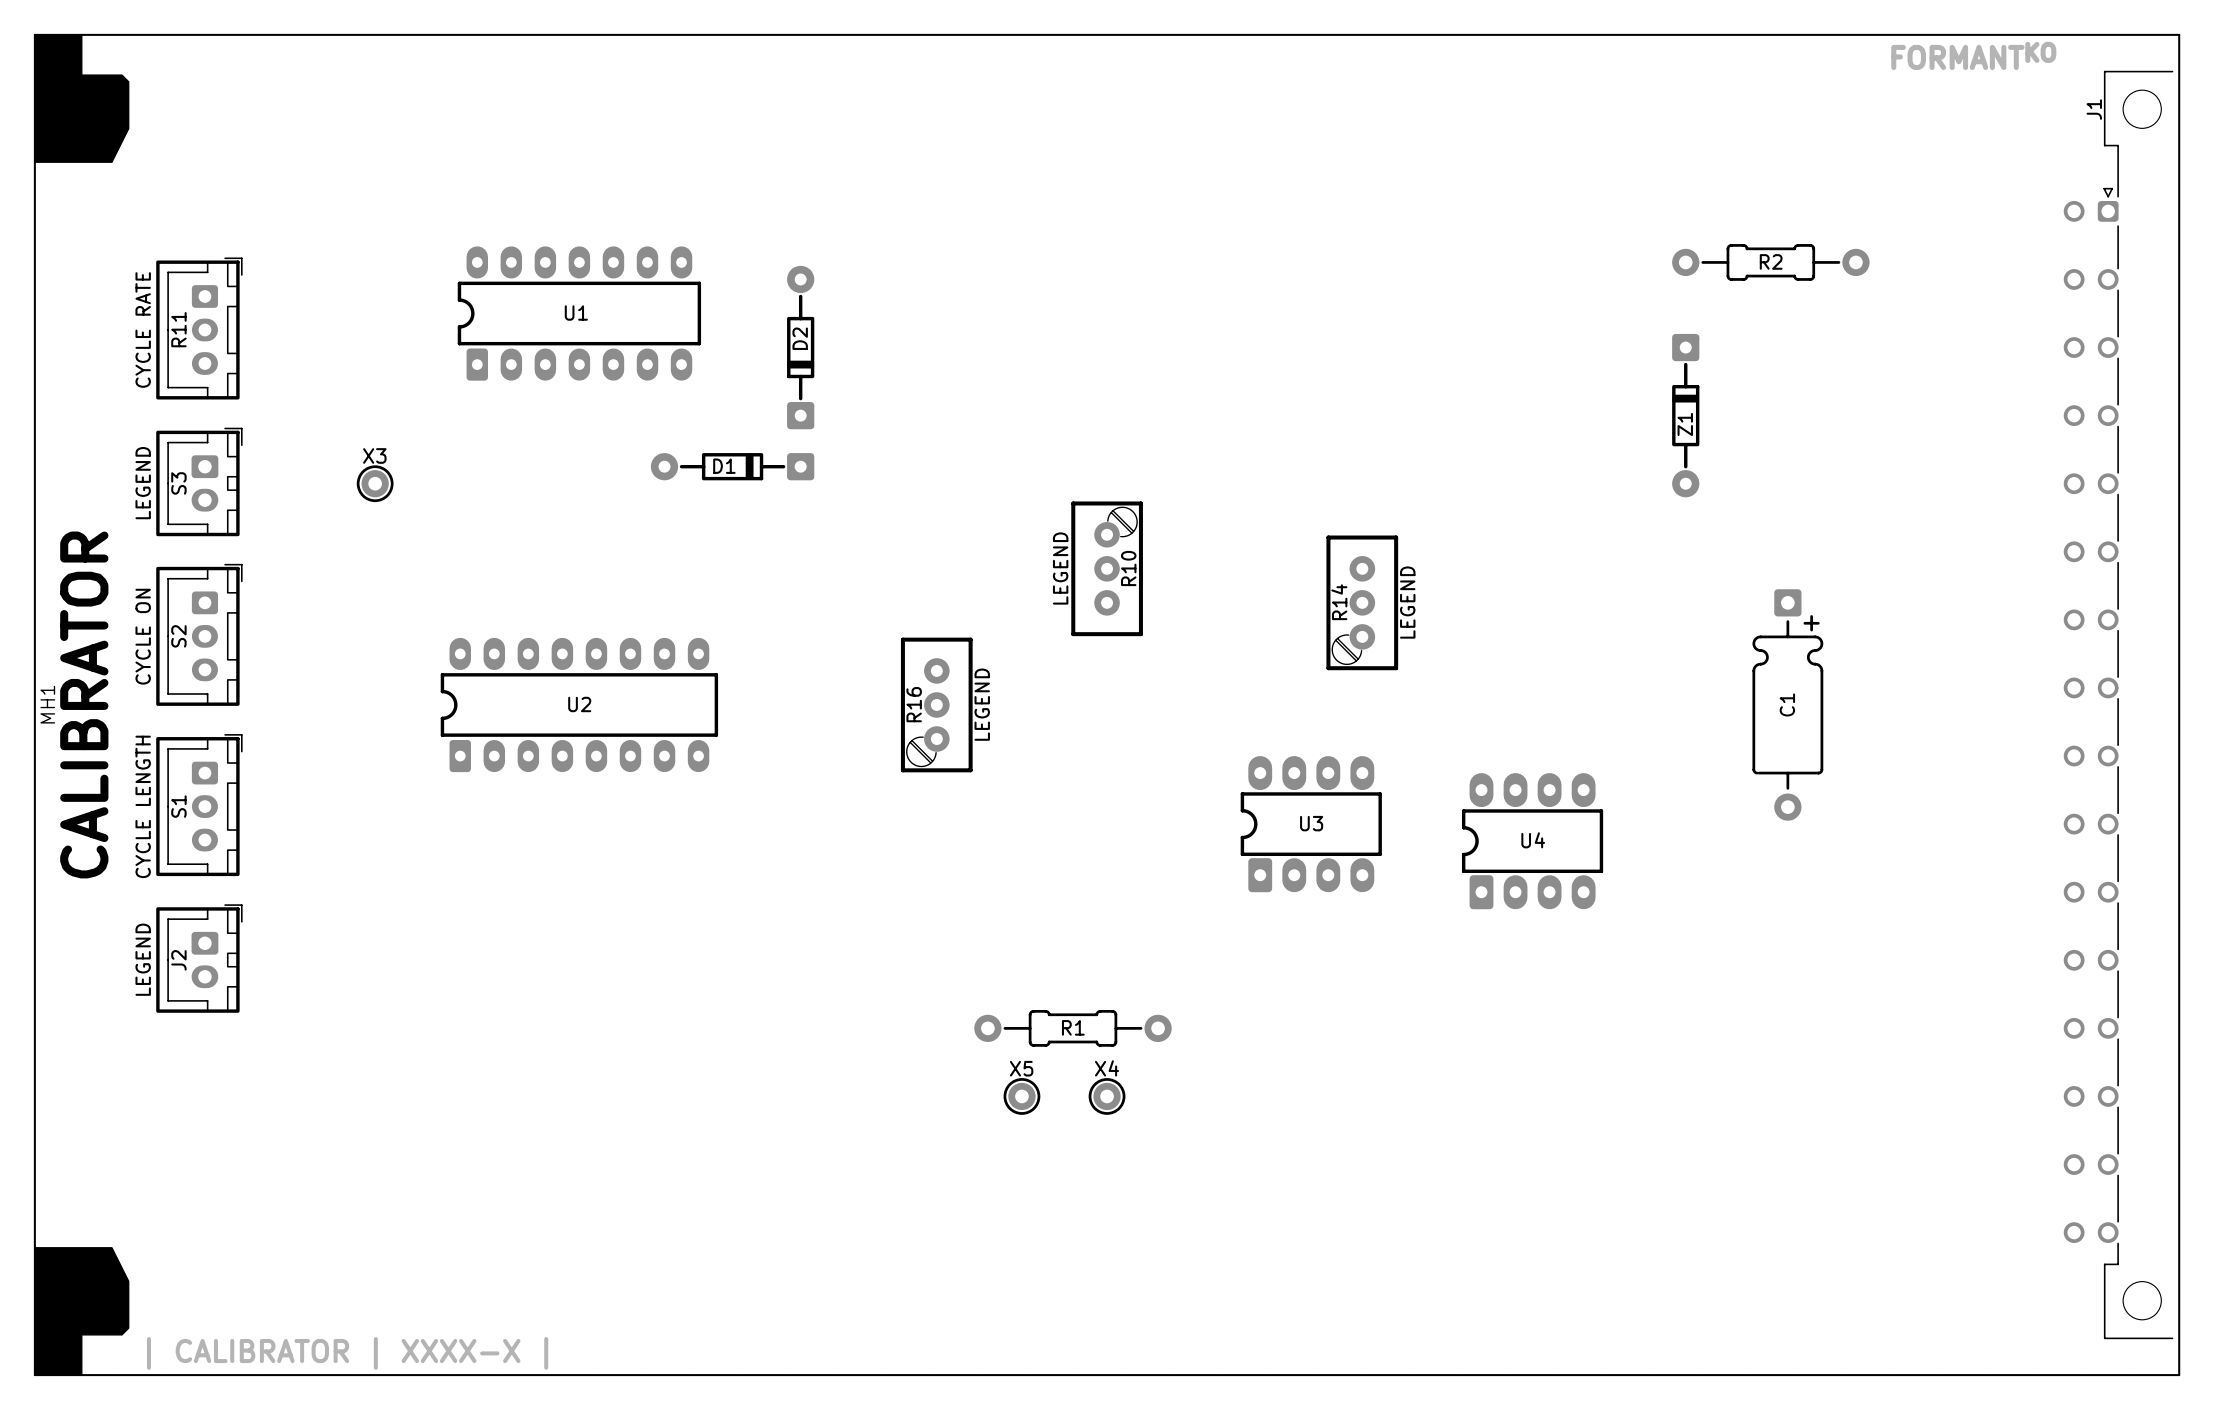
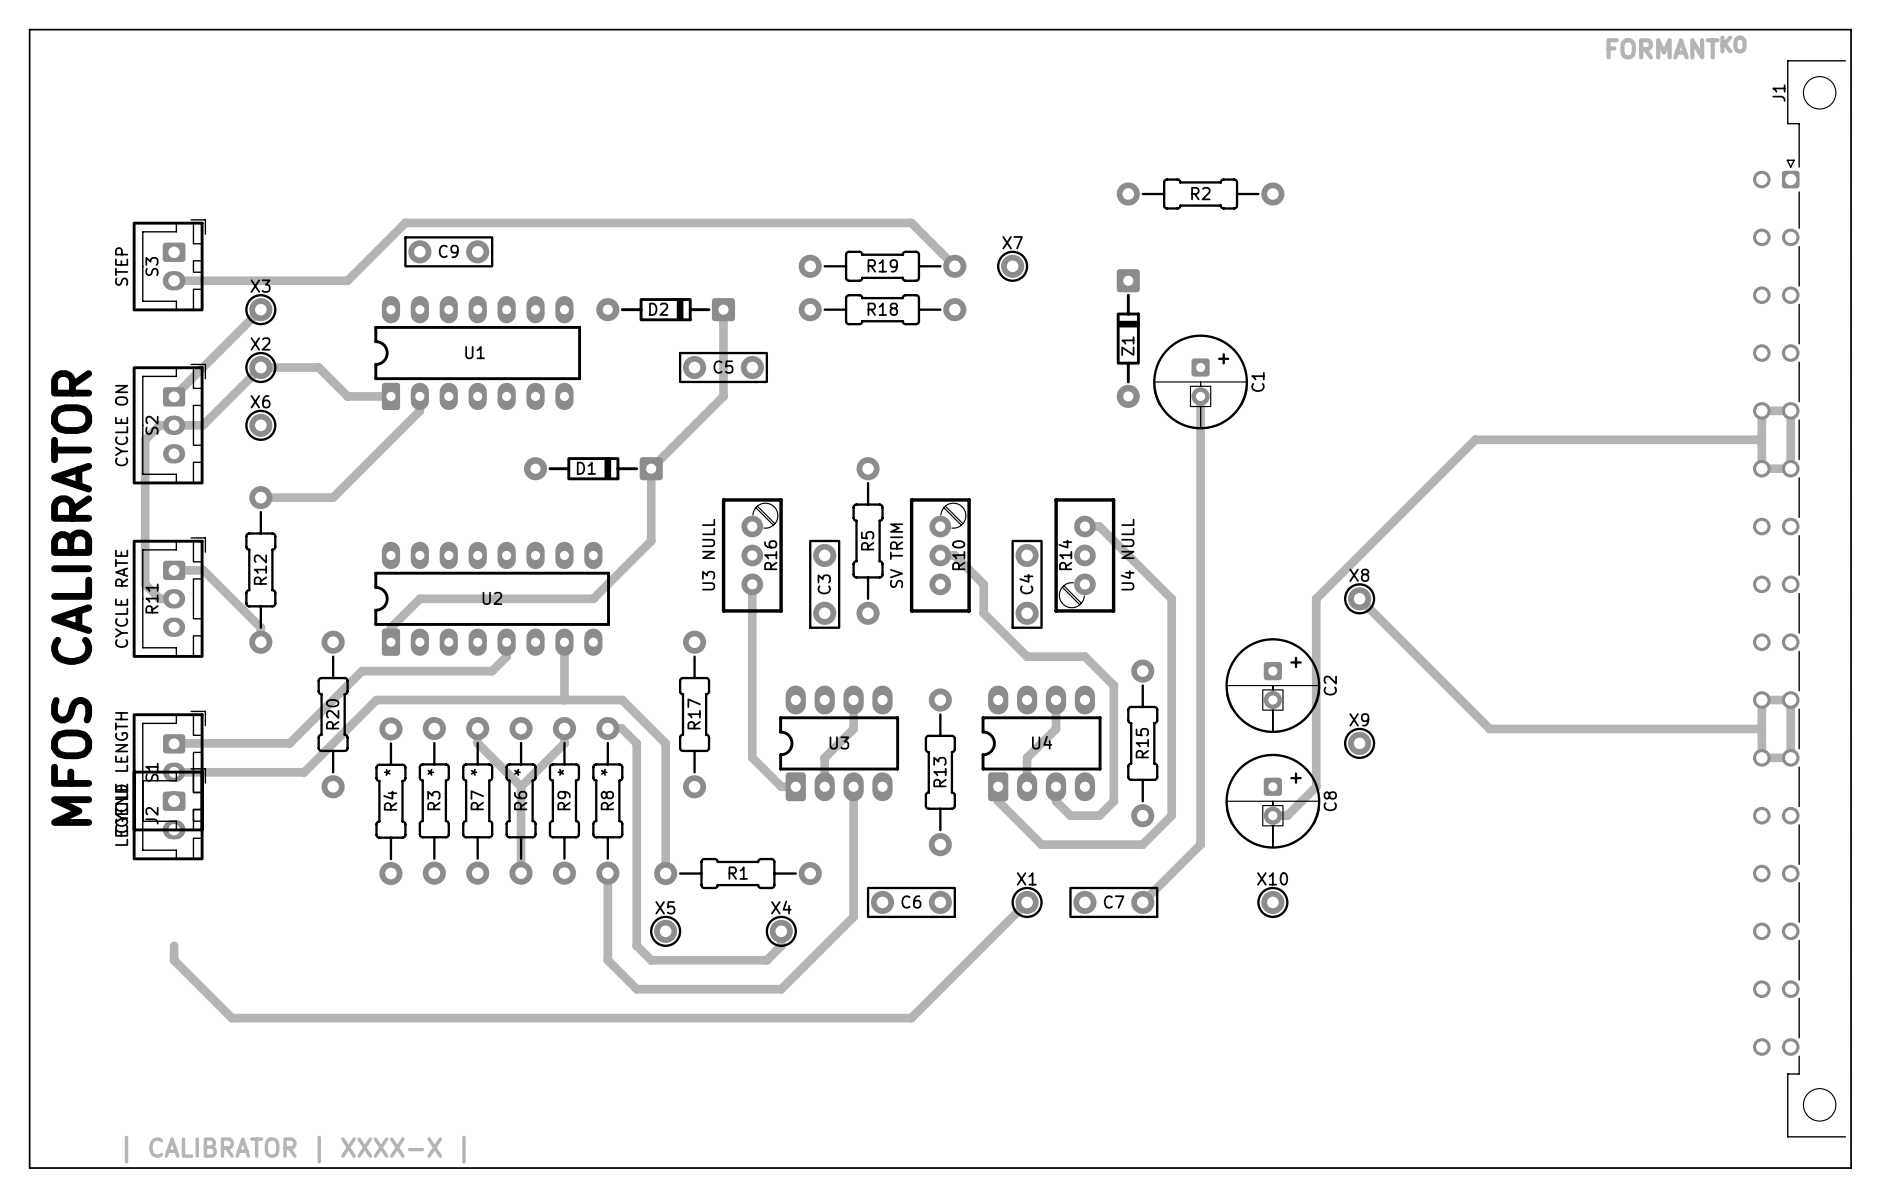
R2 position: (1770, 262) -> (1200, 194)
C9: none -> (448, 251)
U1 position: (579, 313) -> (477, 353)
R19: none -> (882, 266)
track: none -> (954, 266) (911, 222) (405, 222) (347, 280) (174, 280)
X7: none -> (1012, 266)
R11 position: (199, 328) -> (169, 597)
D2 rotation: 0° (800, 347) -> 90° counterclockwise (665, 309)
track: none -> (260, 309) (174, 396)
track: none -> (723, 309) (723, 396) (651, 468) (651, 540) (593, 598) (419, 598) (390, 627) (390, 642)
R18: none -> (882, 309)
Z1 position: (1685, 415) -> (1128, 338)
X2: none -> (260, 367)
C5: none -> (723, 367)
track: none -> (390, 396) (347, 396) (318, 367) (260, 367) (203, 425) (159, 425) (145, 439) (145, 584) (159, 598) (174, 598)
track: none -> (419, 396) (419, 410) (333, 497) (260, 497)
D1 position: (732, 466) -> (593, 468)
track: none -> (1200, 396) (1200, 844) (1142, 902)
S3 position: (199, 481) -> (169, 265)
S3 text: LEGEND (143, 483) -> STEP (121, 266)
X3 position: (375, 483) -> (260, 309)
track: none -> (1761, 410) (1761, 468) (1790, 468) (1790, 410) (1761, 410)
X6: none -> (260, 425)
track: none -> (1761, 439) (1475, 439) (1316, 598) (1316, 786) (1287, 815) (1272, 815)
R10 text: LEGEND (1060, 568) -> SV TRIM (896, 555)
R10 position: (1107, 568) -> (940, 555)
C1 footprint: [1752, 589, 1824, 821] -> [1153, 334, 1249, 430]
R14 position: (1362, 602) -> (1084, 555)
R14 text: LEGEND (1407, 602) -> U4 NULL (1127, 554)
track: none -> (1084, 526) (1099, 526) (1171, 598) (1171, 815) (1142, 844) (1041, 844) (998, 801) (998, 786)
S2 position: (199, 634) -> (169, 424)
R5: none -> (868, 540)
track: none -> (940, 555) (954, 555) (983, 584) (983, 613) (1027, 656) (1084, 656) (1113, 685) (1113, 801) (1099, 815) (1070, 815) (1056, 801) (1056, 786)
R12: none -> (260, 569)
track: none -> (174, 570) (203, 570) (260, 627) (260, 642)
track: none -> (752, 584) (752, 757) (781, 786) (795, 786)
C3: none -> (824, 584)
C4: none -> (1027, 584)
MH1: (81, 704) -> none
text: CALIBRATOR (84, 704) -> MFOS CALIBRATOR (71, 598)
R16 rotation: 0° (936, 704) -> 180° (752, 555)
R16 text: LEGEND (982, 704) -> U3 NULL (708, 554)
track: none -> (1359, 598) (1489, 728) (1761, 728)
X8: none -> (1359, 598)
C1 name position: C1 (1787, 704) -> C1 (1257, 381)
track: none -> (506, 642) (506, 656) (492, 671) (362, 671) (289, 743) (174, 743)
track: none -> (564, 642) (564, 700)
S1 position: (199, 805) -> (169, 771)
C2: none -> (1272, 685)
track: none -> (853, 700) (853, 728) (824, 757) (824, 786)
track: none -> (1056, 700) (1056, 728) (1027, 757) (1027, 786)
U3 position: (1311, 824) -> (839, 743)
track: none -> (1761, 700) (1761, 757) (1790, 757) (1790, 700) (1761, 700)
R20: none -> (333, 714)
R17: none -> (694, 714)
U4 position: (1532, 841) -> (1041, 743)
track: none -> (477, 728) (477, 743) (521, 786)
track: none -> (564, 728) (564, 743) (521, 786)
track: none -> (607, 728) (621, 728) (636, 743) (636, 945) (651, 960) (766, 960) (781, 945) (781, 931)
R15: none -> (1142, 743)
X9: none -> (1359, 743)
track: none -> (174, 772) (304, 772) (376, 700) (622, 700) (665, 743) (665, 873)
R13: none -> (940, 772)
track: none -> (521, 786) (521, 873)
track: none -> (853, 786) (853, 916) (781, 989) (636, 989) (607, 960) (607, 873)
R3: none -> (434, 800)
R7: none -> (477, 800)
R6: none -> (521, 800)
R9: none -> (564, 800)
R8: none -> (607, 800)
R4: none -> (390, 801)
C8: none -> (1272, 801)
R1 position: (1073, 1028) -> (737, 873)
C6: none -> (911, 902)
track: none -> (1027, 902) (911, 1018) (231, 1018) (174, 960) (174, 945)
X1: none -> (1027, 902)
C7: none -> (1113, 902)
X10: none -> (1272, 902)
X5 position: (1021, 1096) -> (665, 931)
X4 position: (1107, 1096) -> (781, 931)

